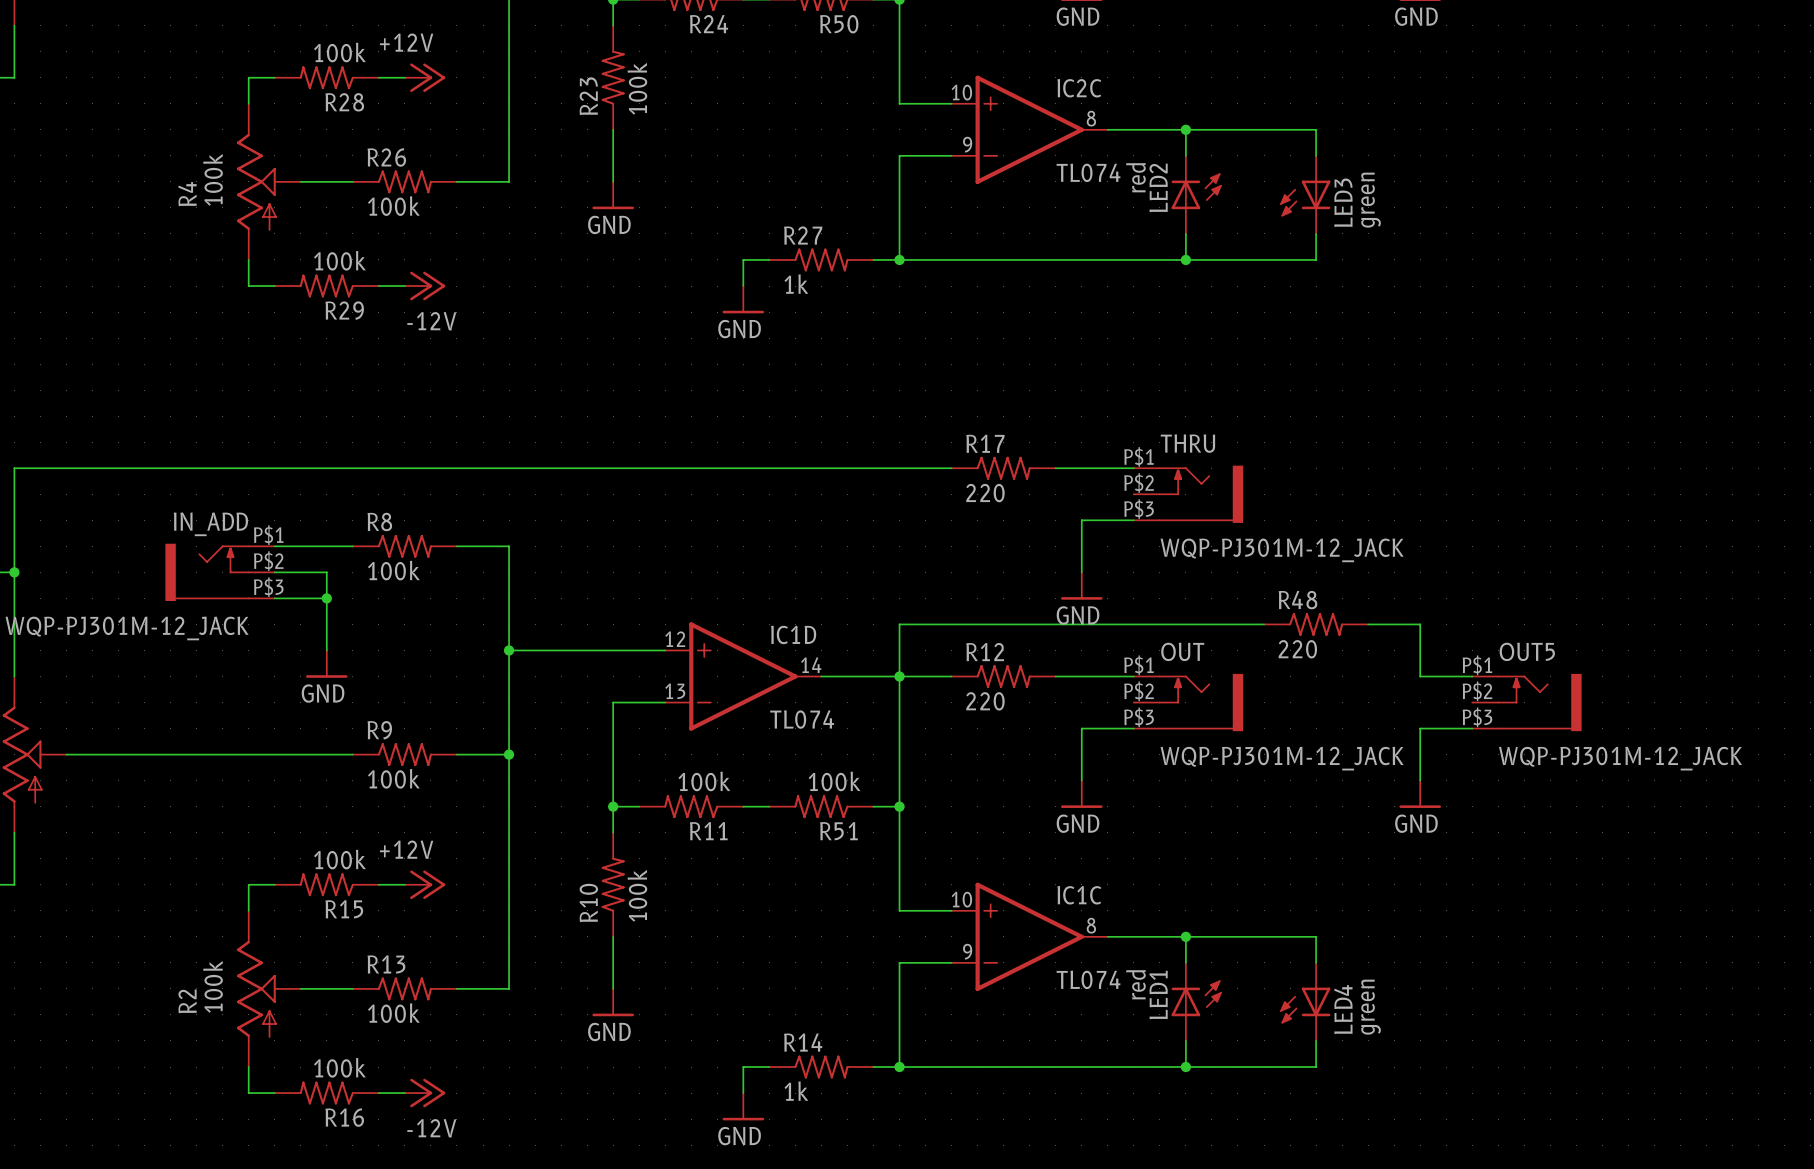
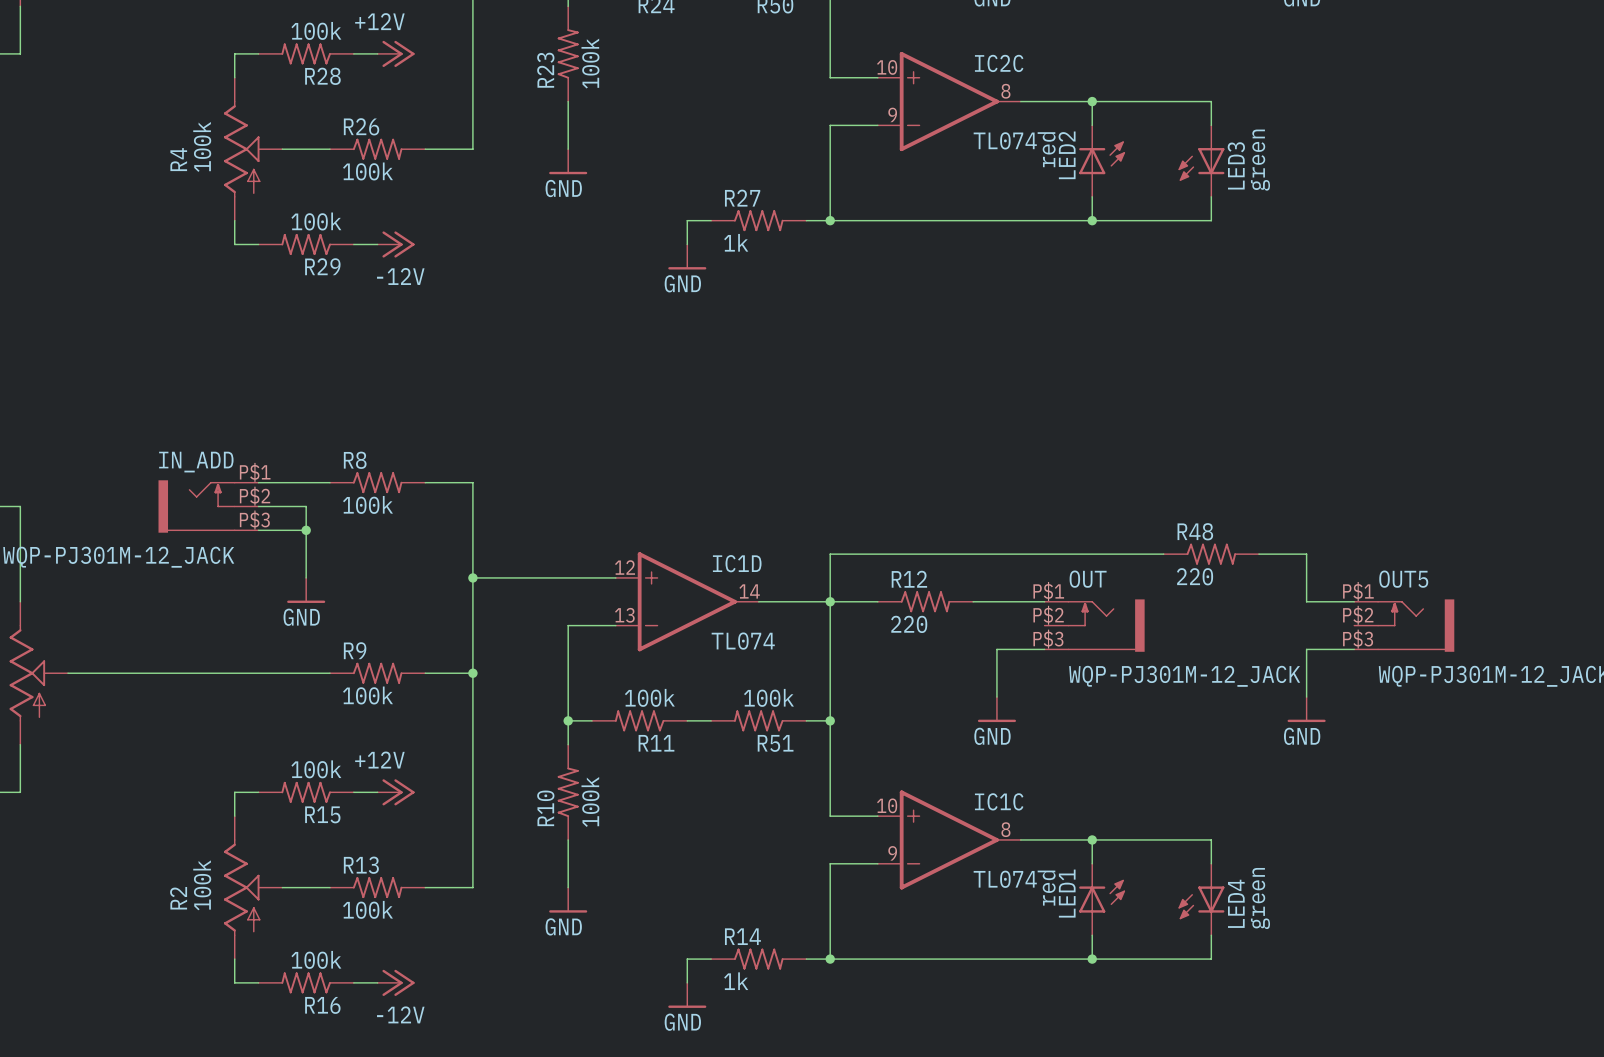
wire: (951, 468) (14, 468) (14, 572) -> none
R17: 220 (1003, 468) -> none
wire: (1055, 468) (1133, 468) -> none
THRU: WQP-PJ301M-12_JACK (1188, 494) -> none
wire: (1133, 520) (1081, 520) (1081, 572) -> none
junction: (14, 572) -> none
power symbol: GND (1081, 586) -> none

